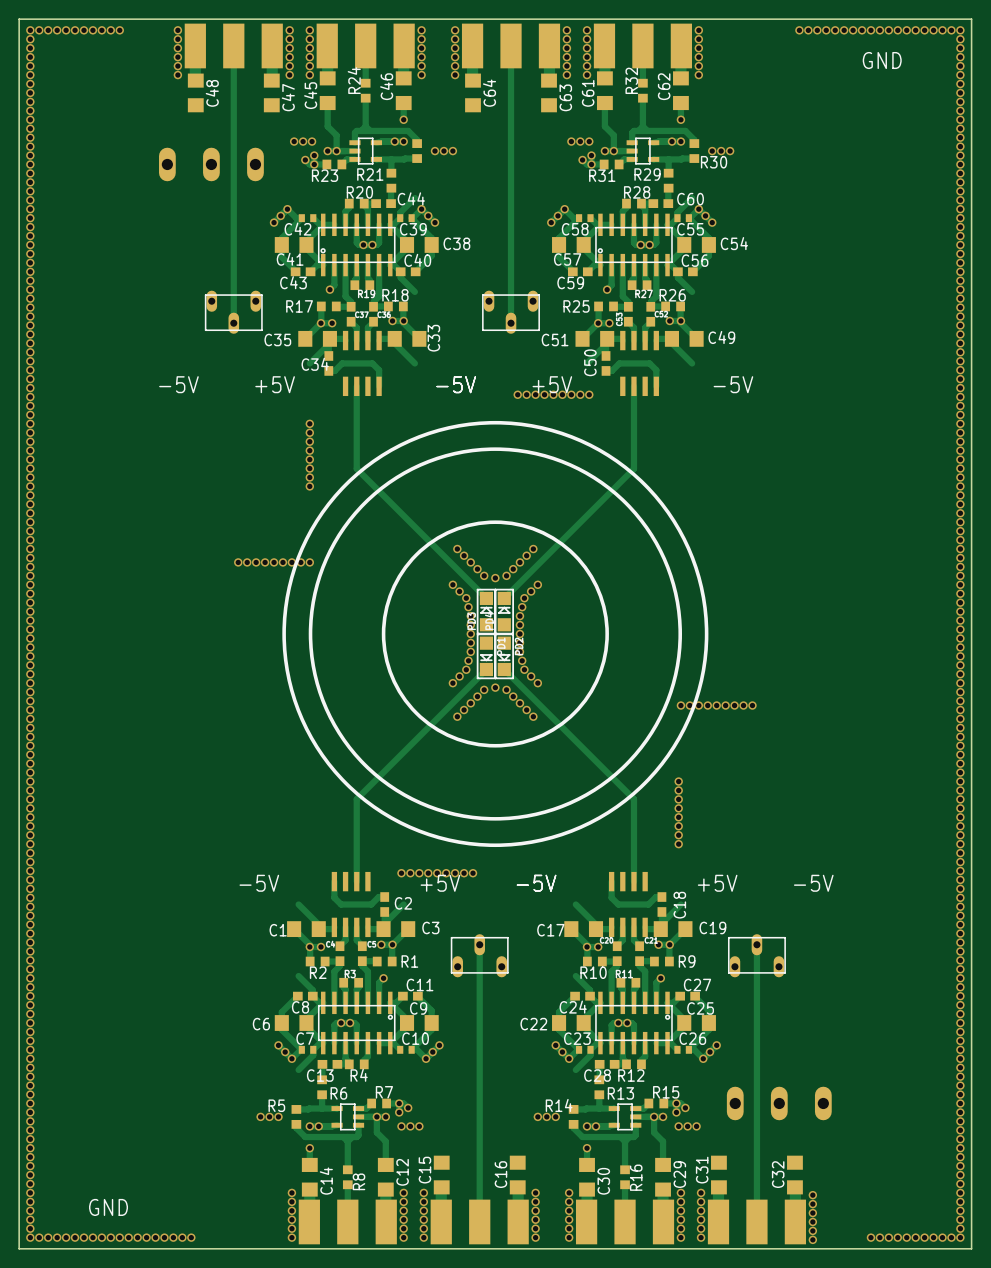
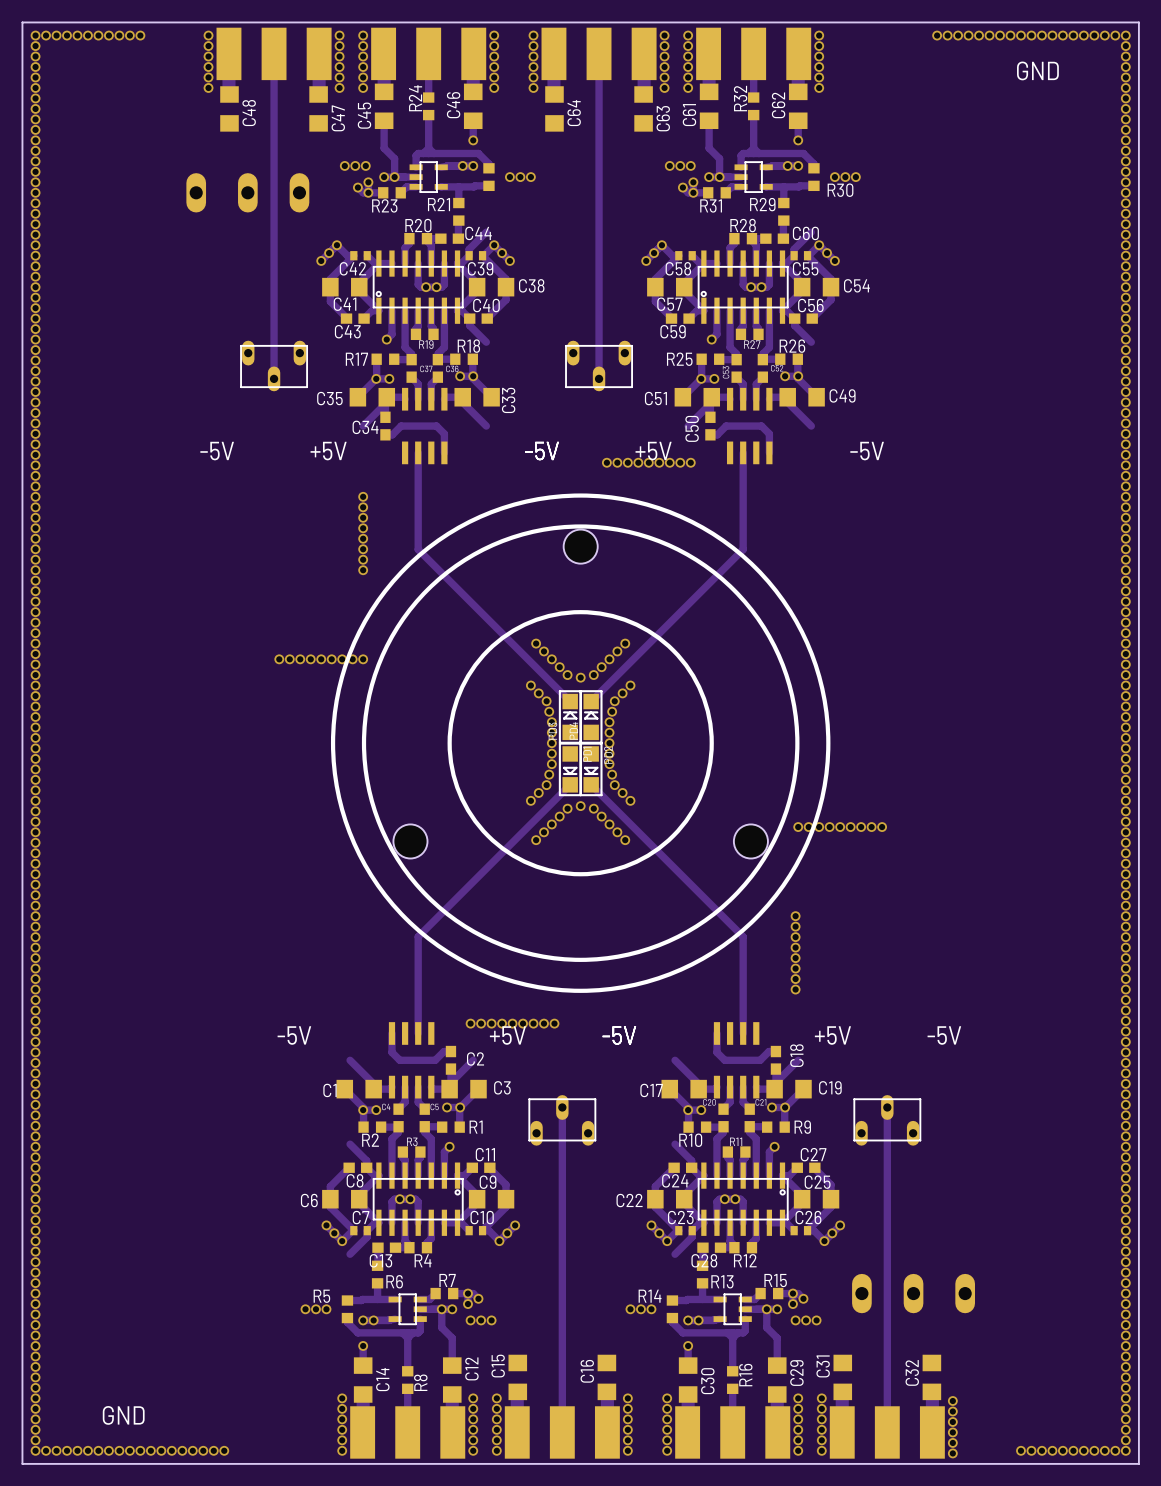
hole: none -> (580, 546)
hole: none -> (410, 841)
hole: none -> (750, 841)

